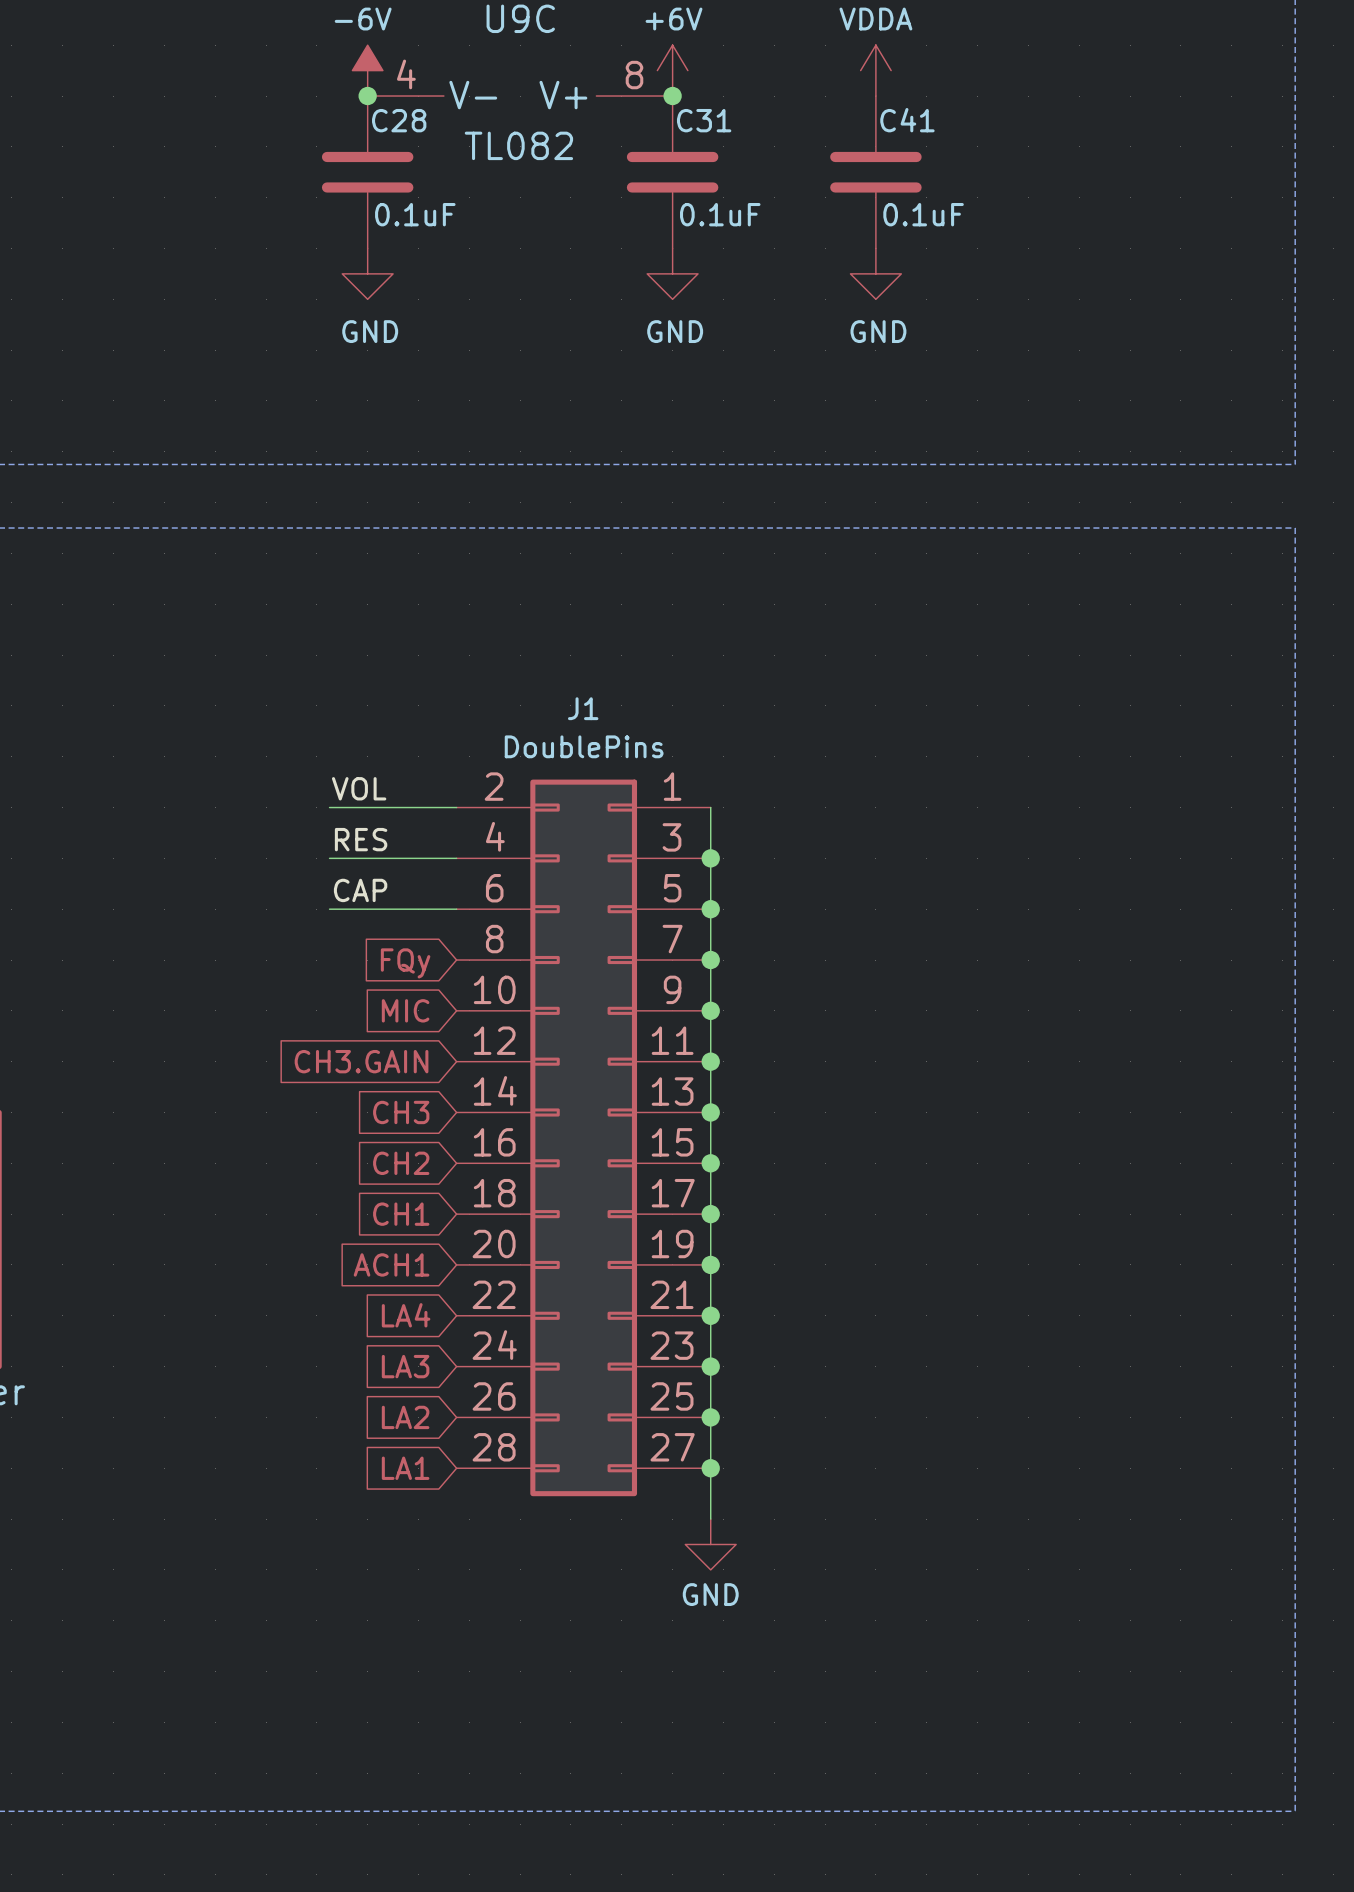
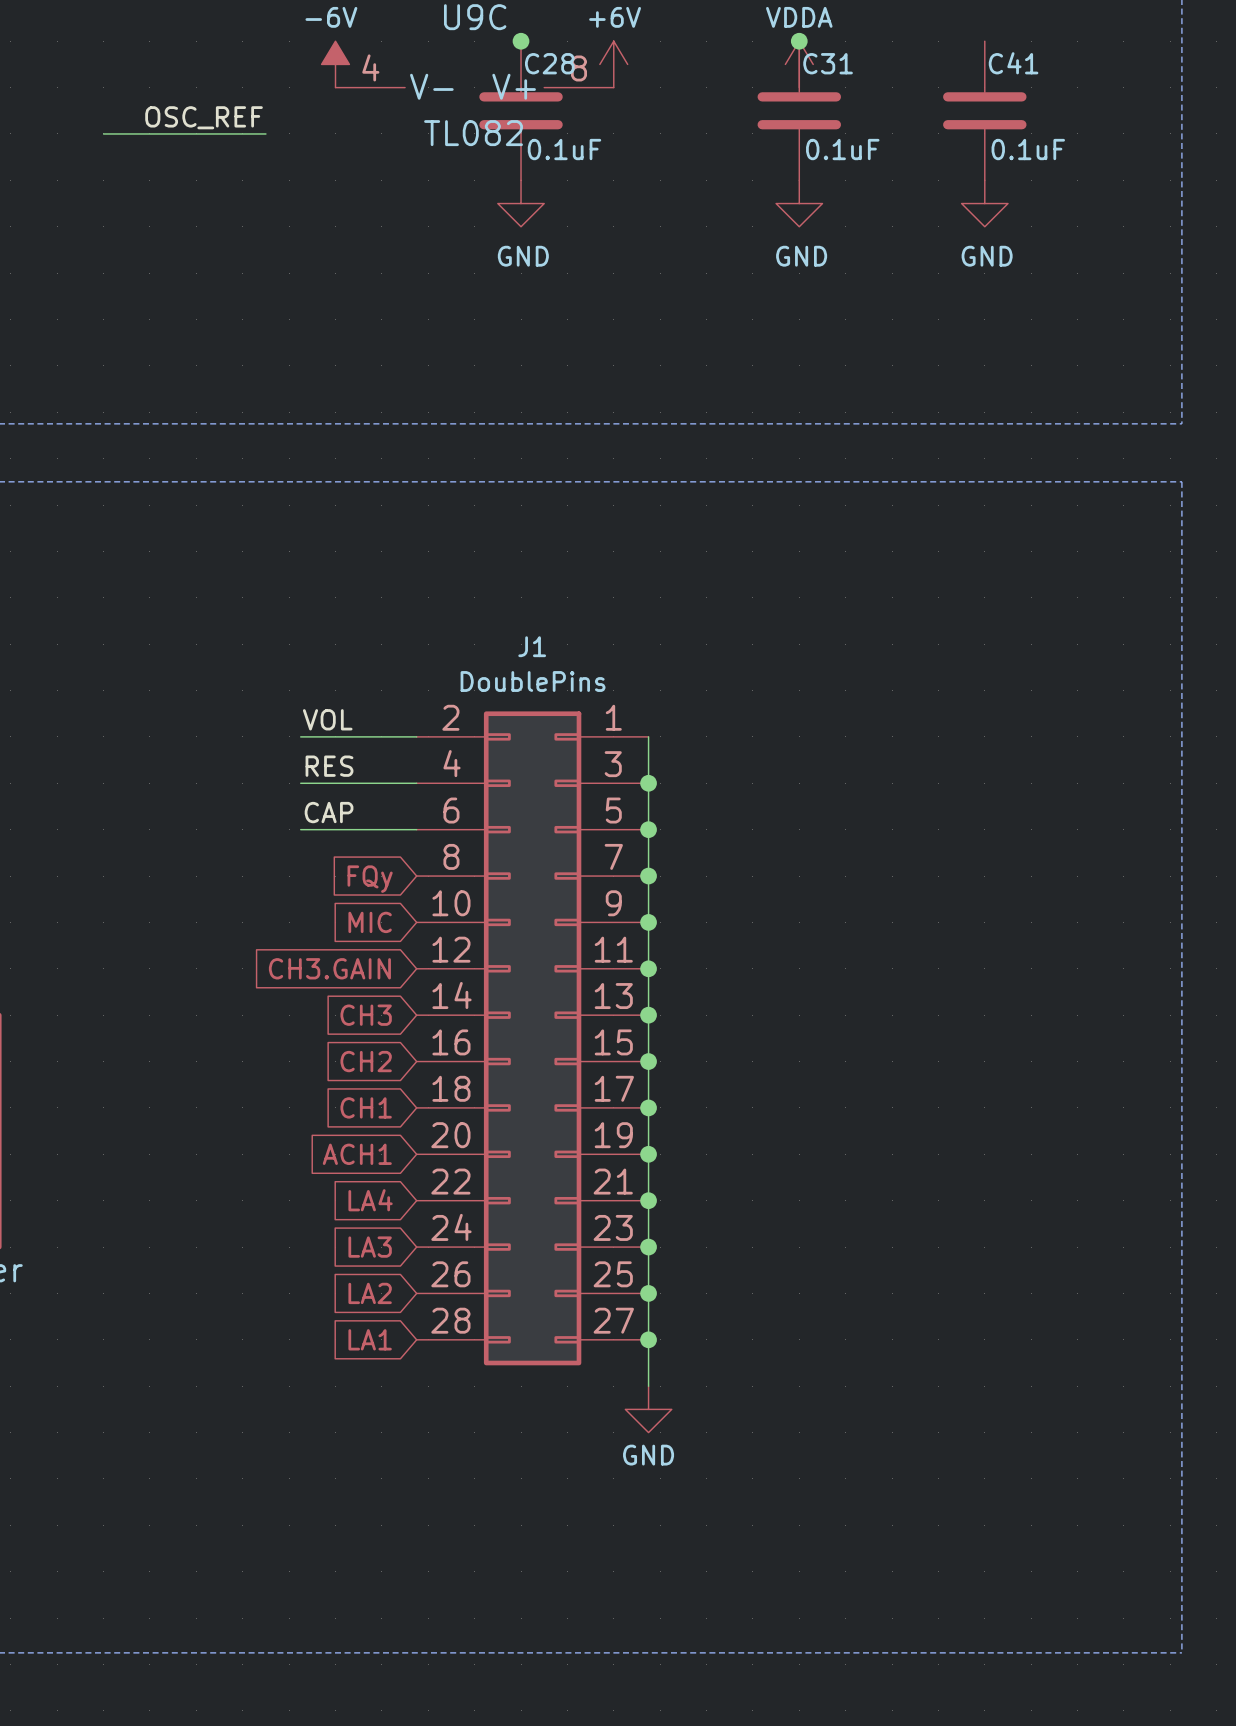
junction: none -> (521, 41)
junction: none -> (799, 41)
junction: (367, 96) -> none
junction: (672, 96) -> none
label: none -> OSC_REF (204, 117)
wire: none -> (103, 133) (265, 133)
C28 position: (367, 172) -> (521, 110)
C31 position: (672, 172) -> (799, 110)
C41 position: (875, 172) -> (984, 110)
power symbol: none -> GND (521, 203)
power symbol: none -> GND (984, 203)
power symbol: GND (367, 273) -> none
power symbol: GND (672, 273) -> none
power symbol position: GND (875, 273) -> GND (799, 203)

